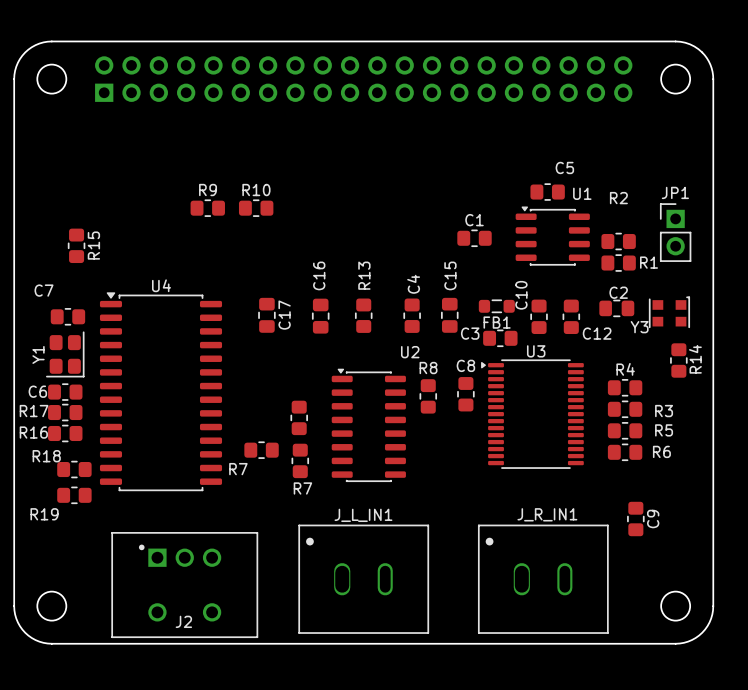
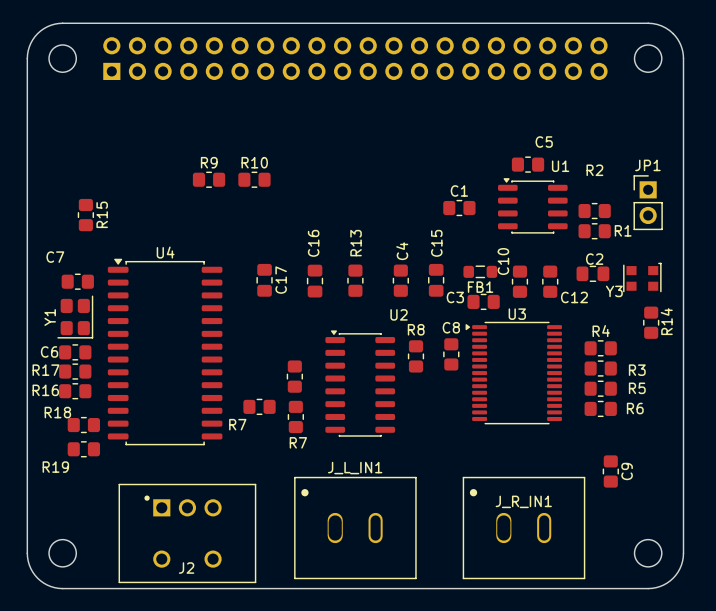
J_R_IN1 name position: J_R_IN1 (547, 514) -> J_R_IN1 (523, 501)

